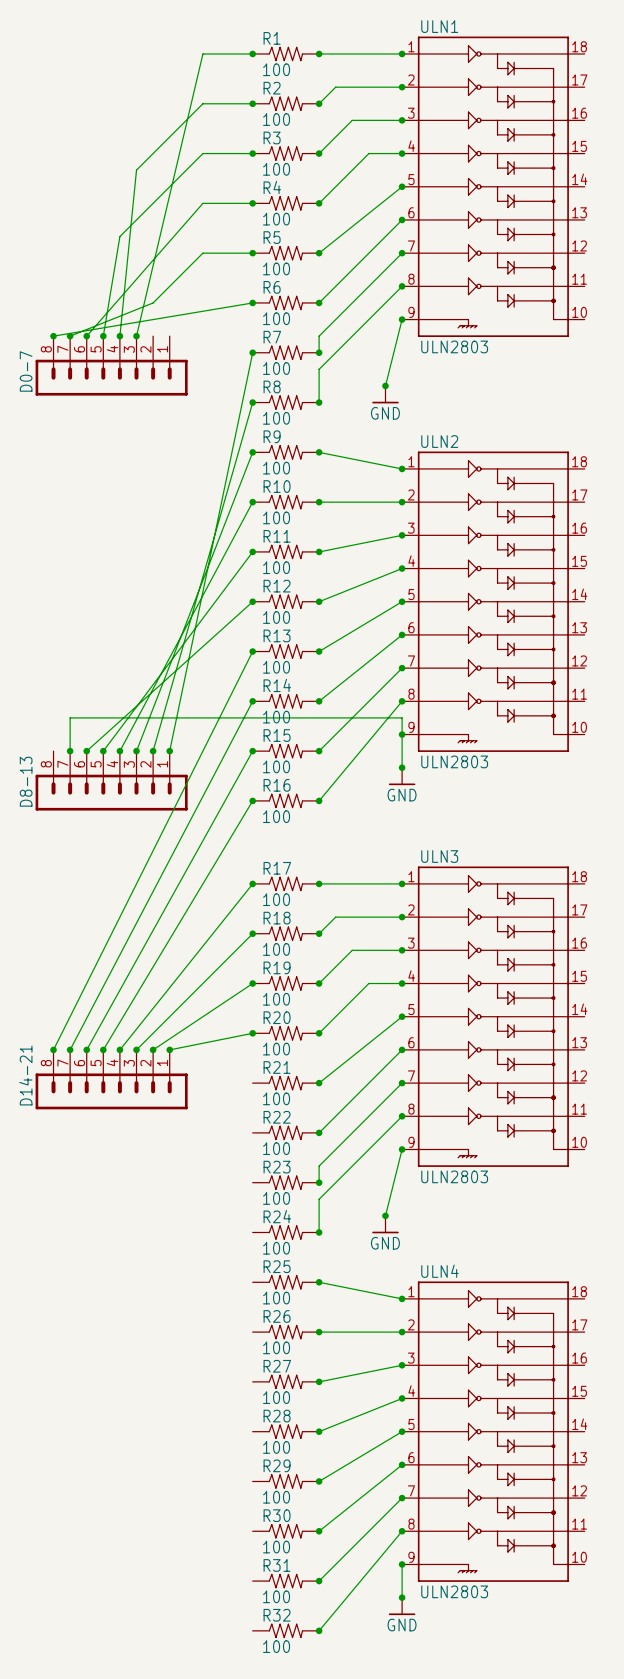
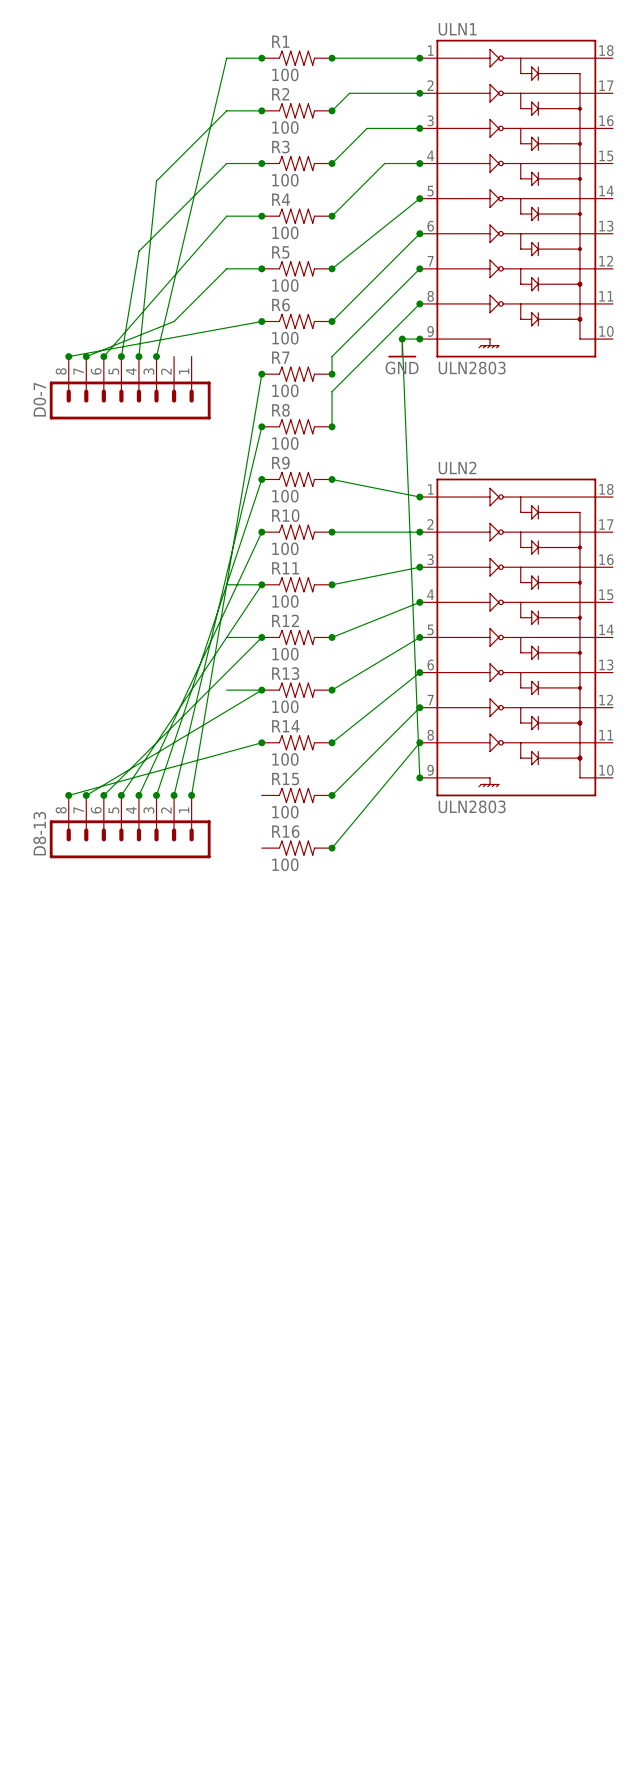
wire: (219, 53) (202, 53) (136, 336) -> (226, 58) (156, 356)
wire: (219, 103) (202, 103) (136, 170) (119, 336) -> (226, 110) (156, 181) (138, 356)
wire: (219, 153) (202, 153) (119, 236) (103, 336) -> (226, 163) (138, 251) (121, 356)
wire: (219, 203) (202, 203) (86, 336) -> (226, 216) (103, 356)
wire: (219, 253) (202, 253) (153, 302) (70, 336) -> (226, 268) (174, 321) (86, 356)
wire: (252, 302) (53, 336) -> (261, 321) (68, 356)
junction: none -> (402, 339)
wire: (402, 319) (385, 385) -> (419, 339) (402, 339) (419, 777)
junction: (53, 336) -> none
junction: none -> (156, 356)
wire: (252, 352) (169, 751) -> (261, 374) (191, 795)
D0-7 position: (111, 365) -> (130, 388)
junction: (385, 385) -> none
power symbol position: GND (385, 394) -> GND (402, 348)
wire: (252, 402) (153, 751) -> (261, 426) (174, 795)
wire: (252, 452) (136, 751) -> (261, 479) (156, 795)
wire: (252, 502) (119, 751) -> (261, 532) (138, 795)
wire: none -> (226, 584) (261, 584) (121, 795)
wire: (252, 551) (103, 751) -> (226, 637) (261, 637) (103, 795)
wire: (252, 601) (86, 751) -> (226, 690) (261, 690) (86, 795)
wire: (252, 651) (53, 1049) -> none
wire: (252, 701) (70, 1049) -> none
wire: (70, 751) (70, 717) (402, 717) (402, 767) -> (68, 795) (261, 742)
junction: none -> (191, 795)
wire: (252, 751) (86, 1049) -> none
junction: (252, 751) -> none
junction: (402, 767) -> none
power symbol: GND (402, 776) -> none
D8-13 position: (111, 780) -> (130, 826)
wire: (252, 800) (103, 1049) -> none
junction: (252, 800) -> none
wire: (252, 883) (119, 1049) -> none
junction: (252, 883) -> none
R17: 100 (285, 883) -> none
wire: (319, 883) (402, 883) -> none
junction: (319, 883) -> none
junction: (402, 883) -> none
wire: (402, 917) (335, 917) (319, 933) -> none
junction: (402, 917) -> none
wire: (252, 933) (136, 1049) -> none
junction: (252, 933) -> none
R18: 100 (285, 933) -> none
junction: (319, 933) -> none
wire: (402, 950) (352, 950) (319, 983) -> none
junction: (402, 950) -> none
wire: (252, 983) (153, 1049) -> none
junction: (252, 983) -> none
R19: 100 (285, 983) -> none
junction: (319, 983) -> none
wire: (402, 983) (368, 983) (319, 1033) -> none
junction: (402, 983) -> none
wire: (402, 1016) (319, 1083) -> none
junction: (402, 1016) -> none
ULN3: ULN2803 (493, 1016) -> none
wire: (252, 1033) (169, 1049) -> none
junction: (252, 1033) -> none
R20: 100 (285, 1033) -> none
junction: (319, 1033) -> none
junction: (53, 1049) -> none
junction: (70, 1049) -> none
junction: (86, 1049) -> none
junction: (103, 1049) -> none
junction: (119, 1049) -> none
junction: (136, 1049) -> none
junction: (153, 1049) -> none
junction: (169, 1049) -> none
wire: (402, 1049) (319, 1132) -> none
junction: (402, 1049) -> none
D14-21: (111, 1079) -> none
R21: 100 (285, 1083) -> none
junction: (319, 1083) -> none
wire: (402, 1083) (319, 1166) (319, 1182) -> none
junction: (402, 1083) -> none
wire: (402, 1116) (319, 1199) (319, 1232) -> none
junction: (402, 1116) -> none
R22: 100 (285, 1132) -> none
junction: (319, 1132) -> none
wire: (402, 1149) (385, 1215) -> none
junction: (402, 1149) -> none
R23: 100 (285, 1182) -> none
junction: (319, 1182) -> none
junction: (385, 1215) -> none
power symbol: GND (385, 1224) -> none
R24: 100 (285, 1232) -> none
junction: (319, 1232) -> none
R25: 100 (285, 1282) -> none
wire: (319, 1282) (402, 1298) -> none
junction: (319, 1282) -> none
junction: (402, 1298) -> none
R26: 100 (285, 1332) -> none
wire: (319, 1332) (402, 1332) -> none
junction: (319, 1332) -> none
junction: (402, 1332) -> none
wire: (402, 1365) (319, 1381) -> none
junction: (402, 1365) -> none
R27: 100 (285, 1381) -> none
junction: (319, 1381) -> none
wire: (402, 1398) (319, 1431) -> none
junction: (402, 1398) -> none
R28: 100 (285, 1431) -> none
junction: (319, 1431) -> none
wire: (402, 1431) (319, 1481) -> none
junction: (402, 1431) -> none
ULN4: ULN2803 (493, 1431) -> none
wire: (402, 1464) (319, 1531) -> none
junction: (402, 1464) -> none
R29: 100 (285, 1481) -> none
junction: (319, 1481) -> none
wire: (402, 1498) (319, 1581) -> none
junction: (402, 1498) -> none
R30: 100 (285, 1531) -> none
junction: (319, 1531) -> none
wire: (402, 1531) (319, 1630) -> none
junction: (402, 1531) -> none
wire: (402, 1564) (402, 1597) -> none
junction: (402, 1564) -> none
R31: 100 (285, 1581) -> none
junction: (319, 1581) -> none
junction: (402, 1597) -> none
power symbol: GND (402, 1606) -> none
R32: 100 (285, 1630) -> none
junction: (319, 1630) -> none

